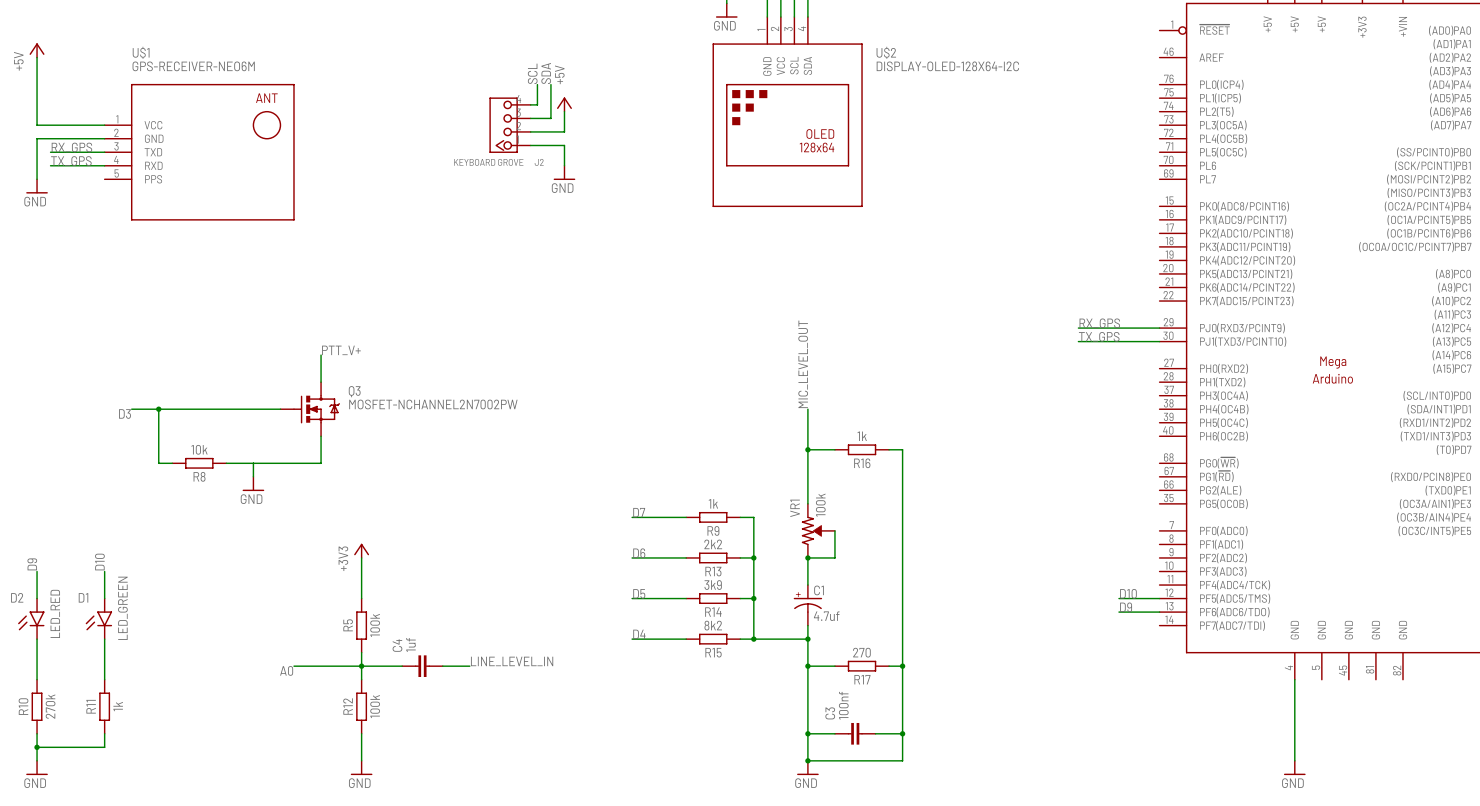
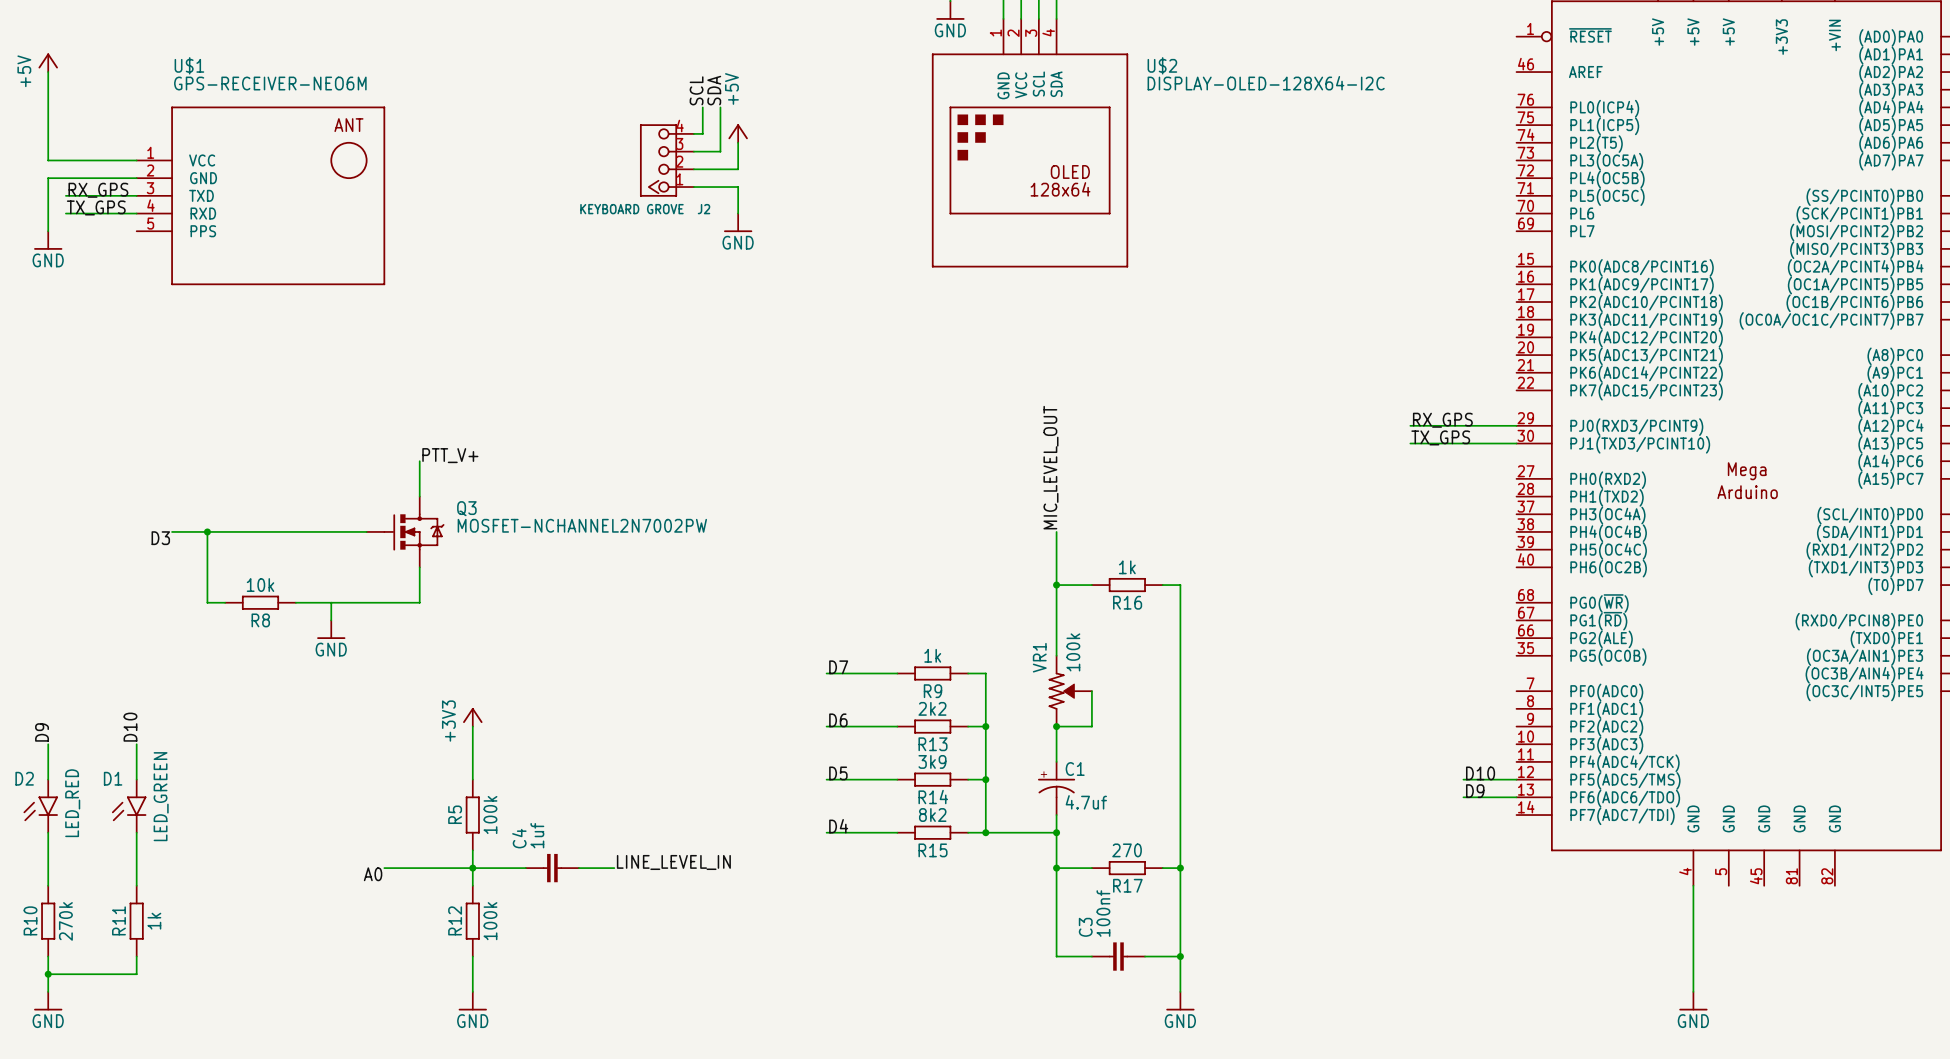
wire: (807, 733) (807, 760) (902, 760) -> none
junction: (807, 733) -> none
junction: (807, 760) -> none
power symbol position: GND (807, 767) -> GND (1180, 1001)

